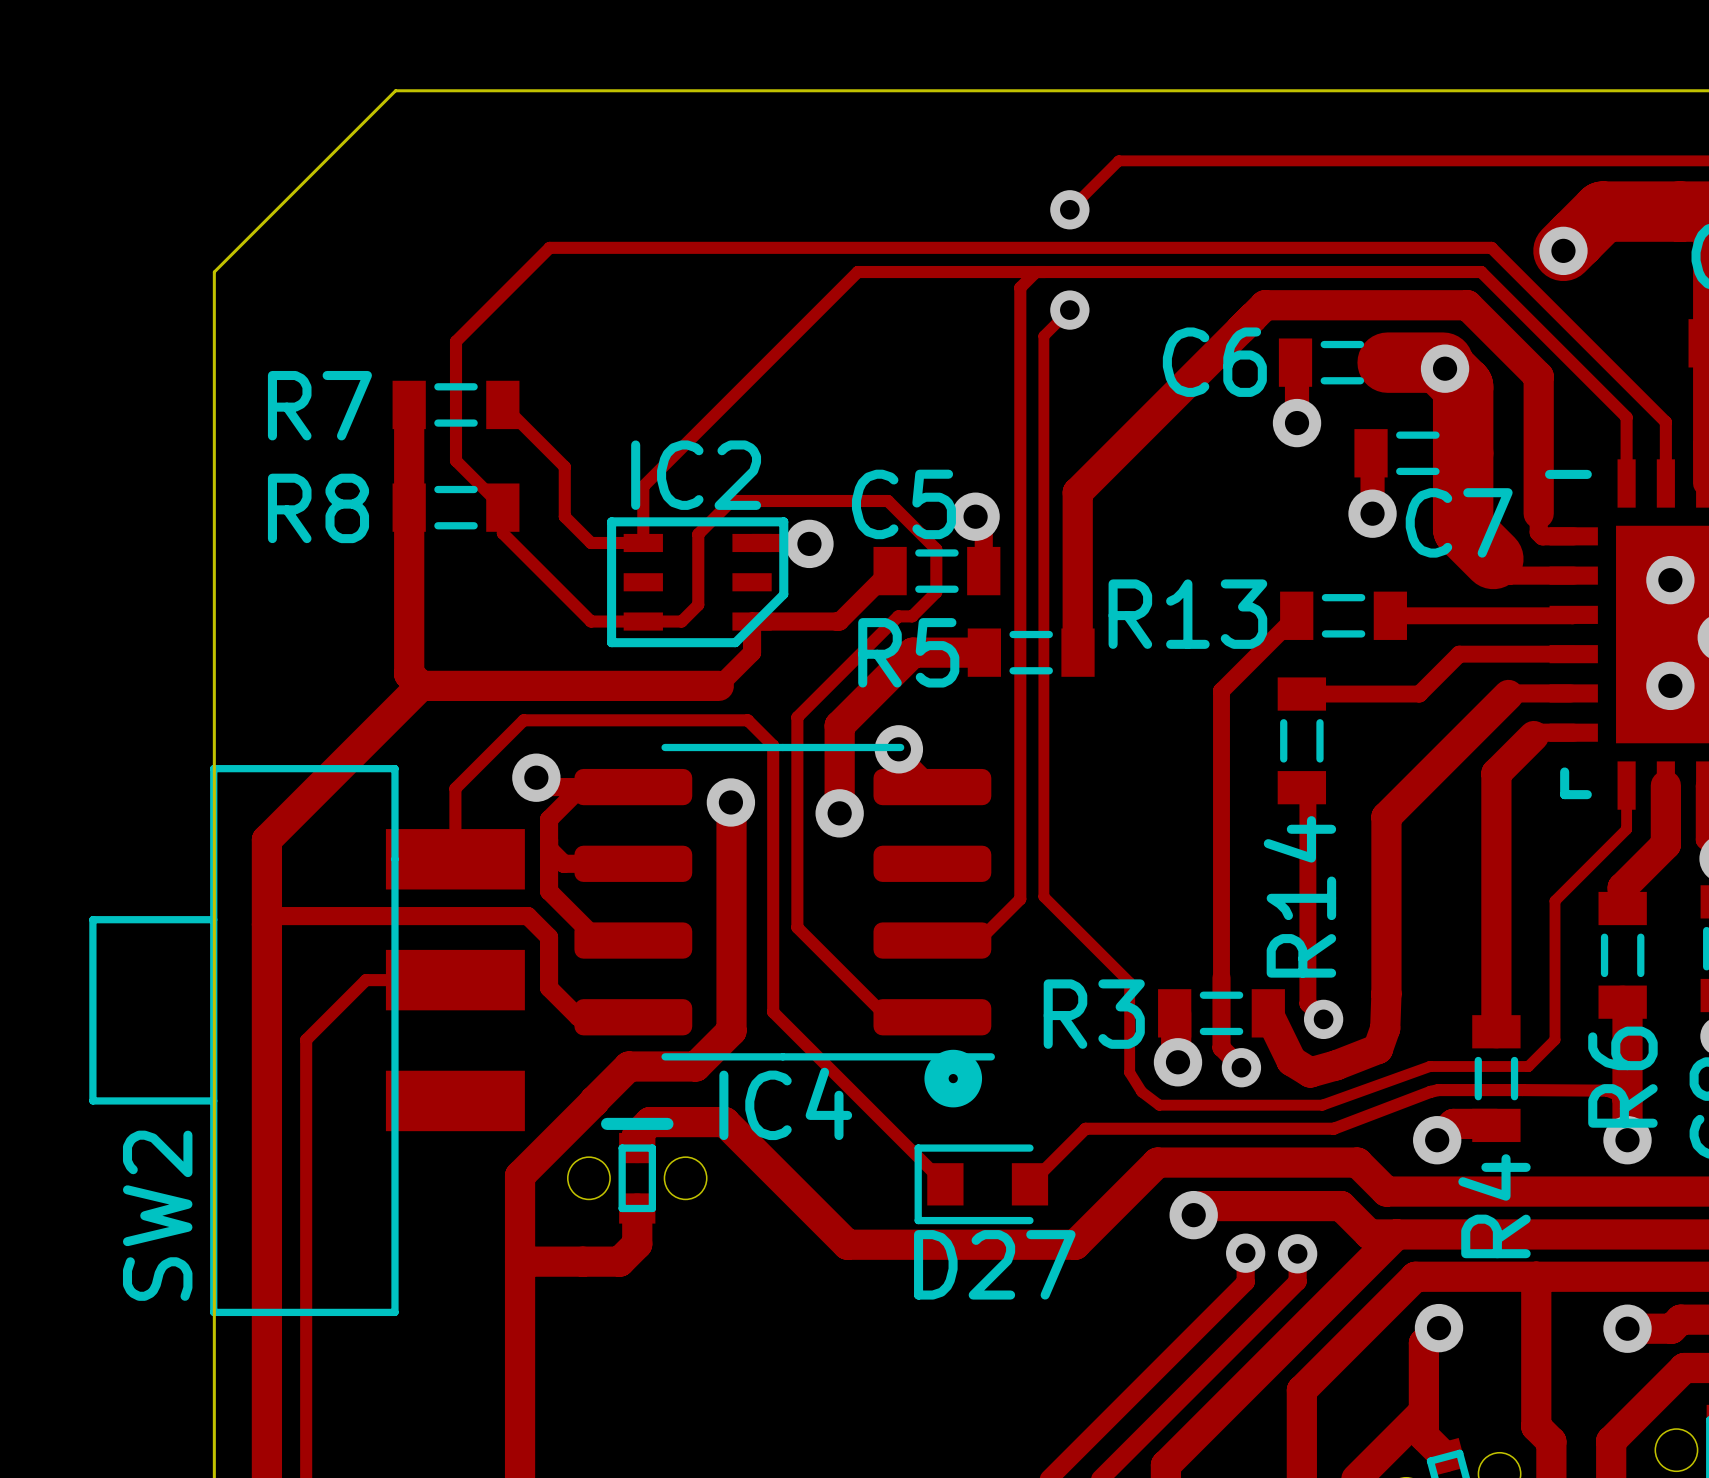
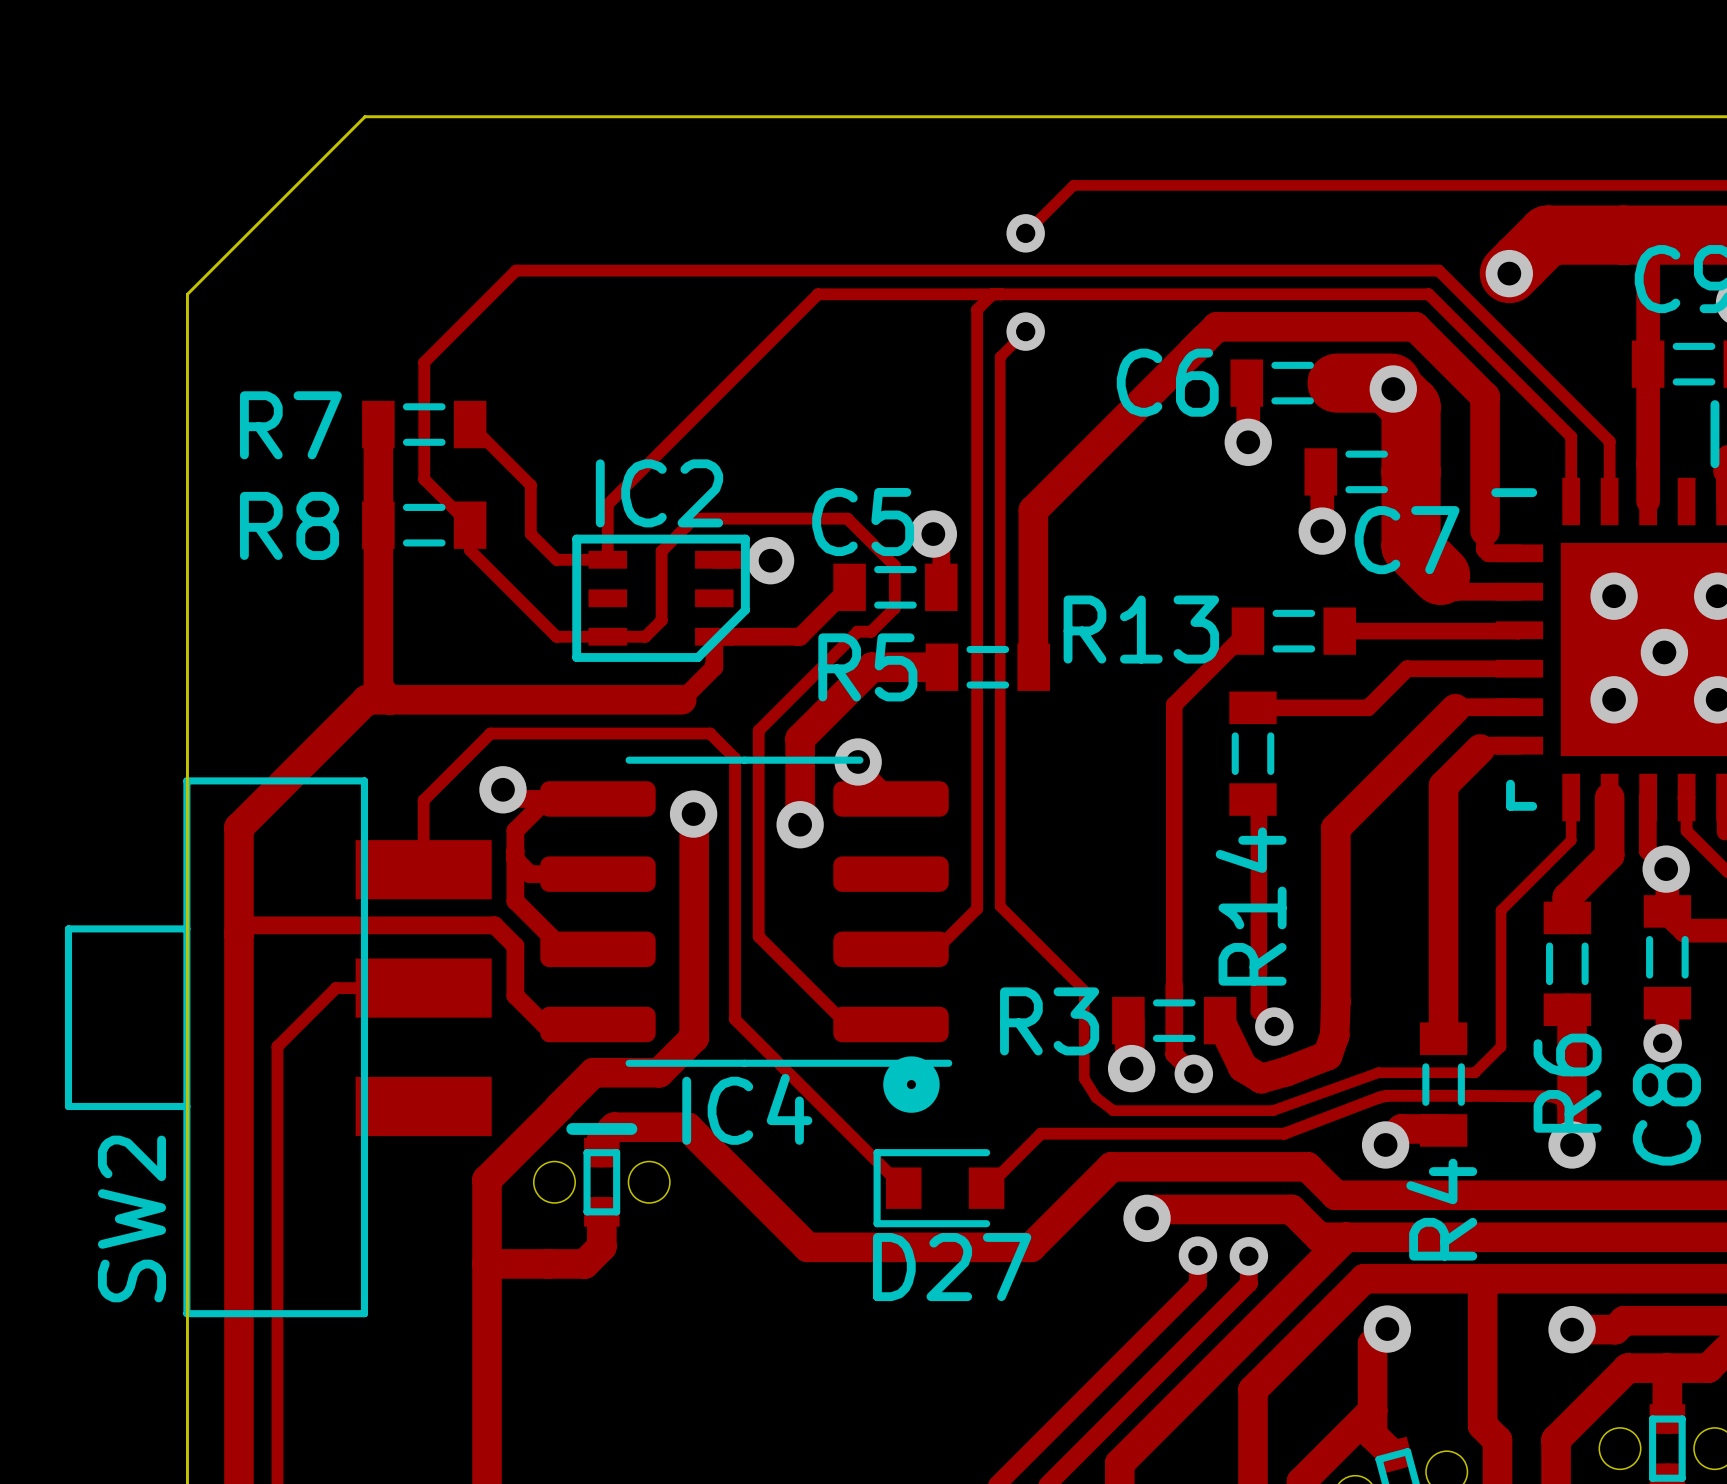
track: (420, 685) (266, 839) -> (389, 699) (366, 699) (238, 827) (238, 850)

